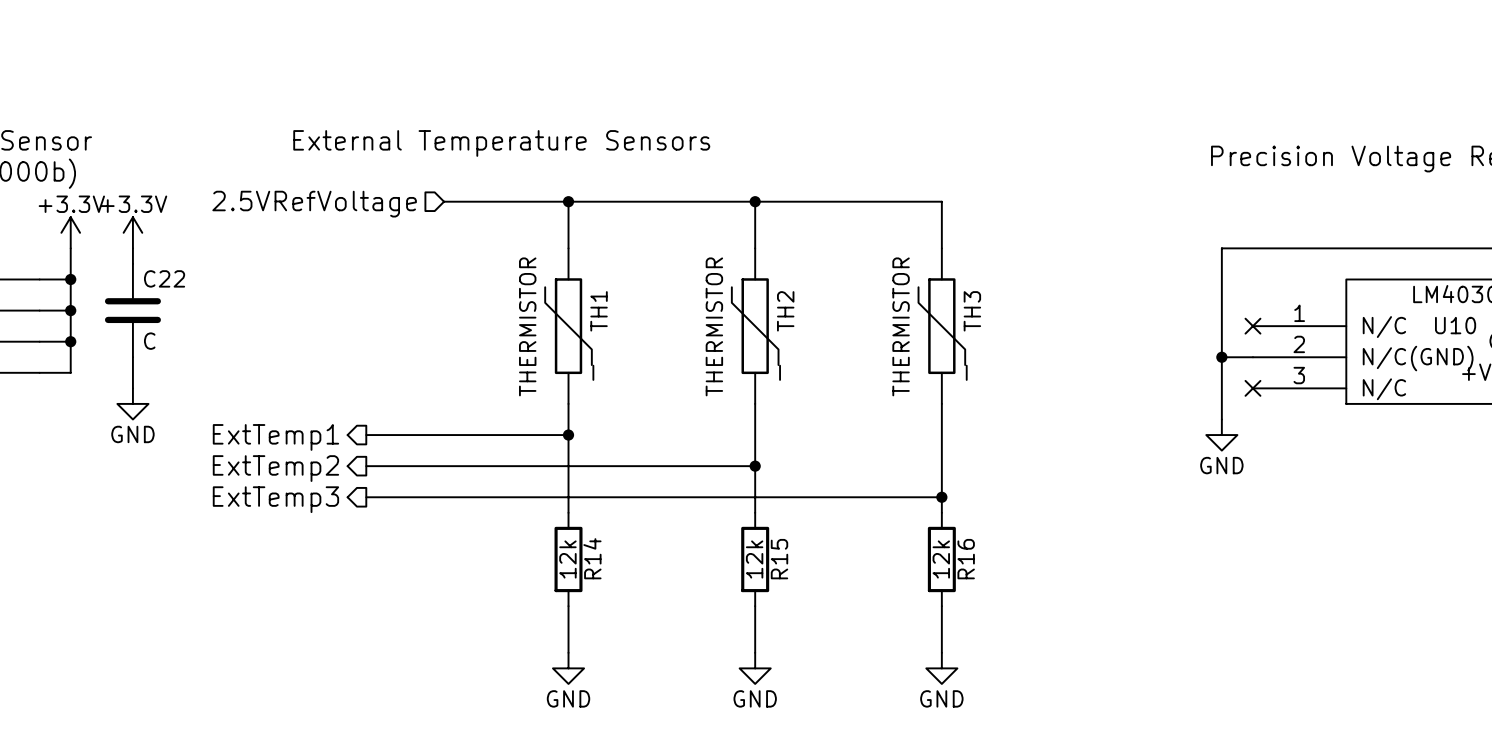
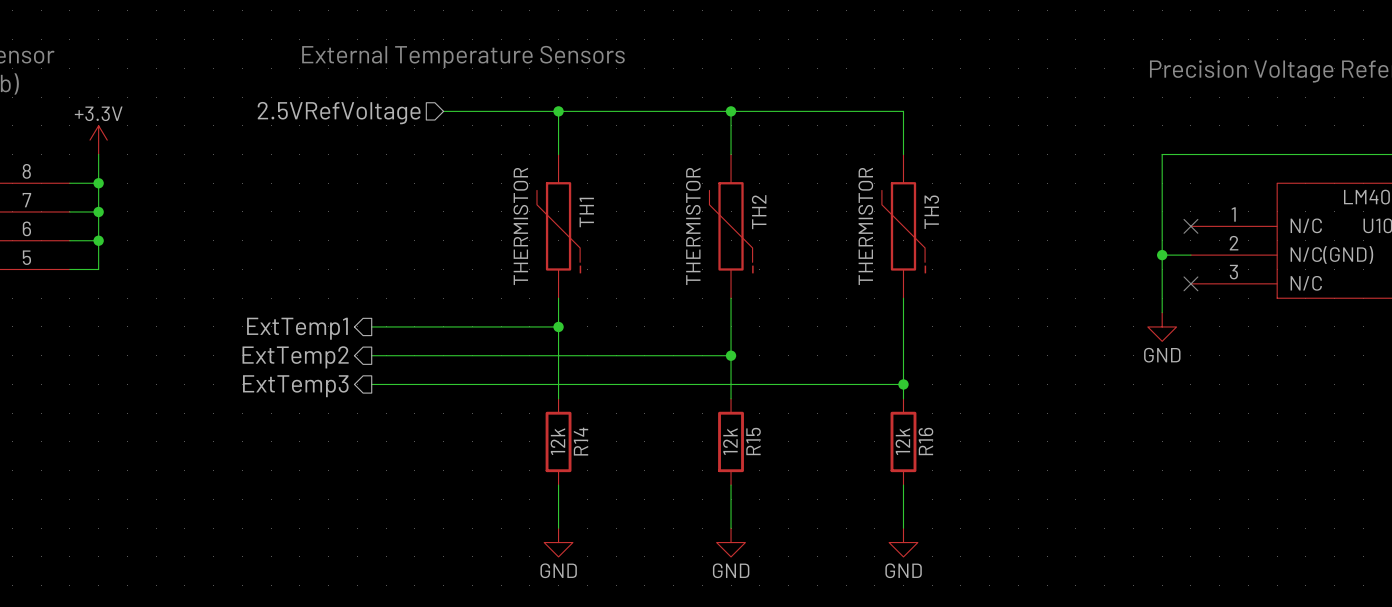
power symbol: +3.3V (132, 232) -> none
wire: (132, 248) (132, 263) -> none
C22: C (132, 310) -> none
wire: (132, 357) (132, 388) -> none
power symbol: GND (132, 403) -> none

